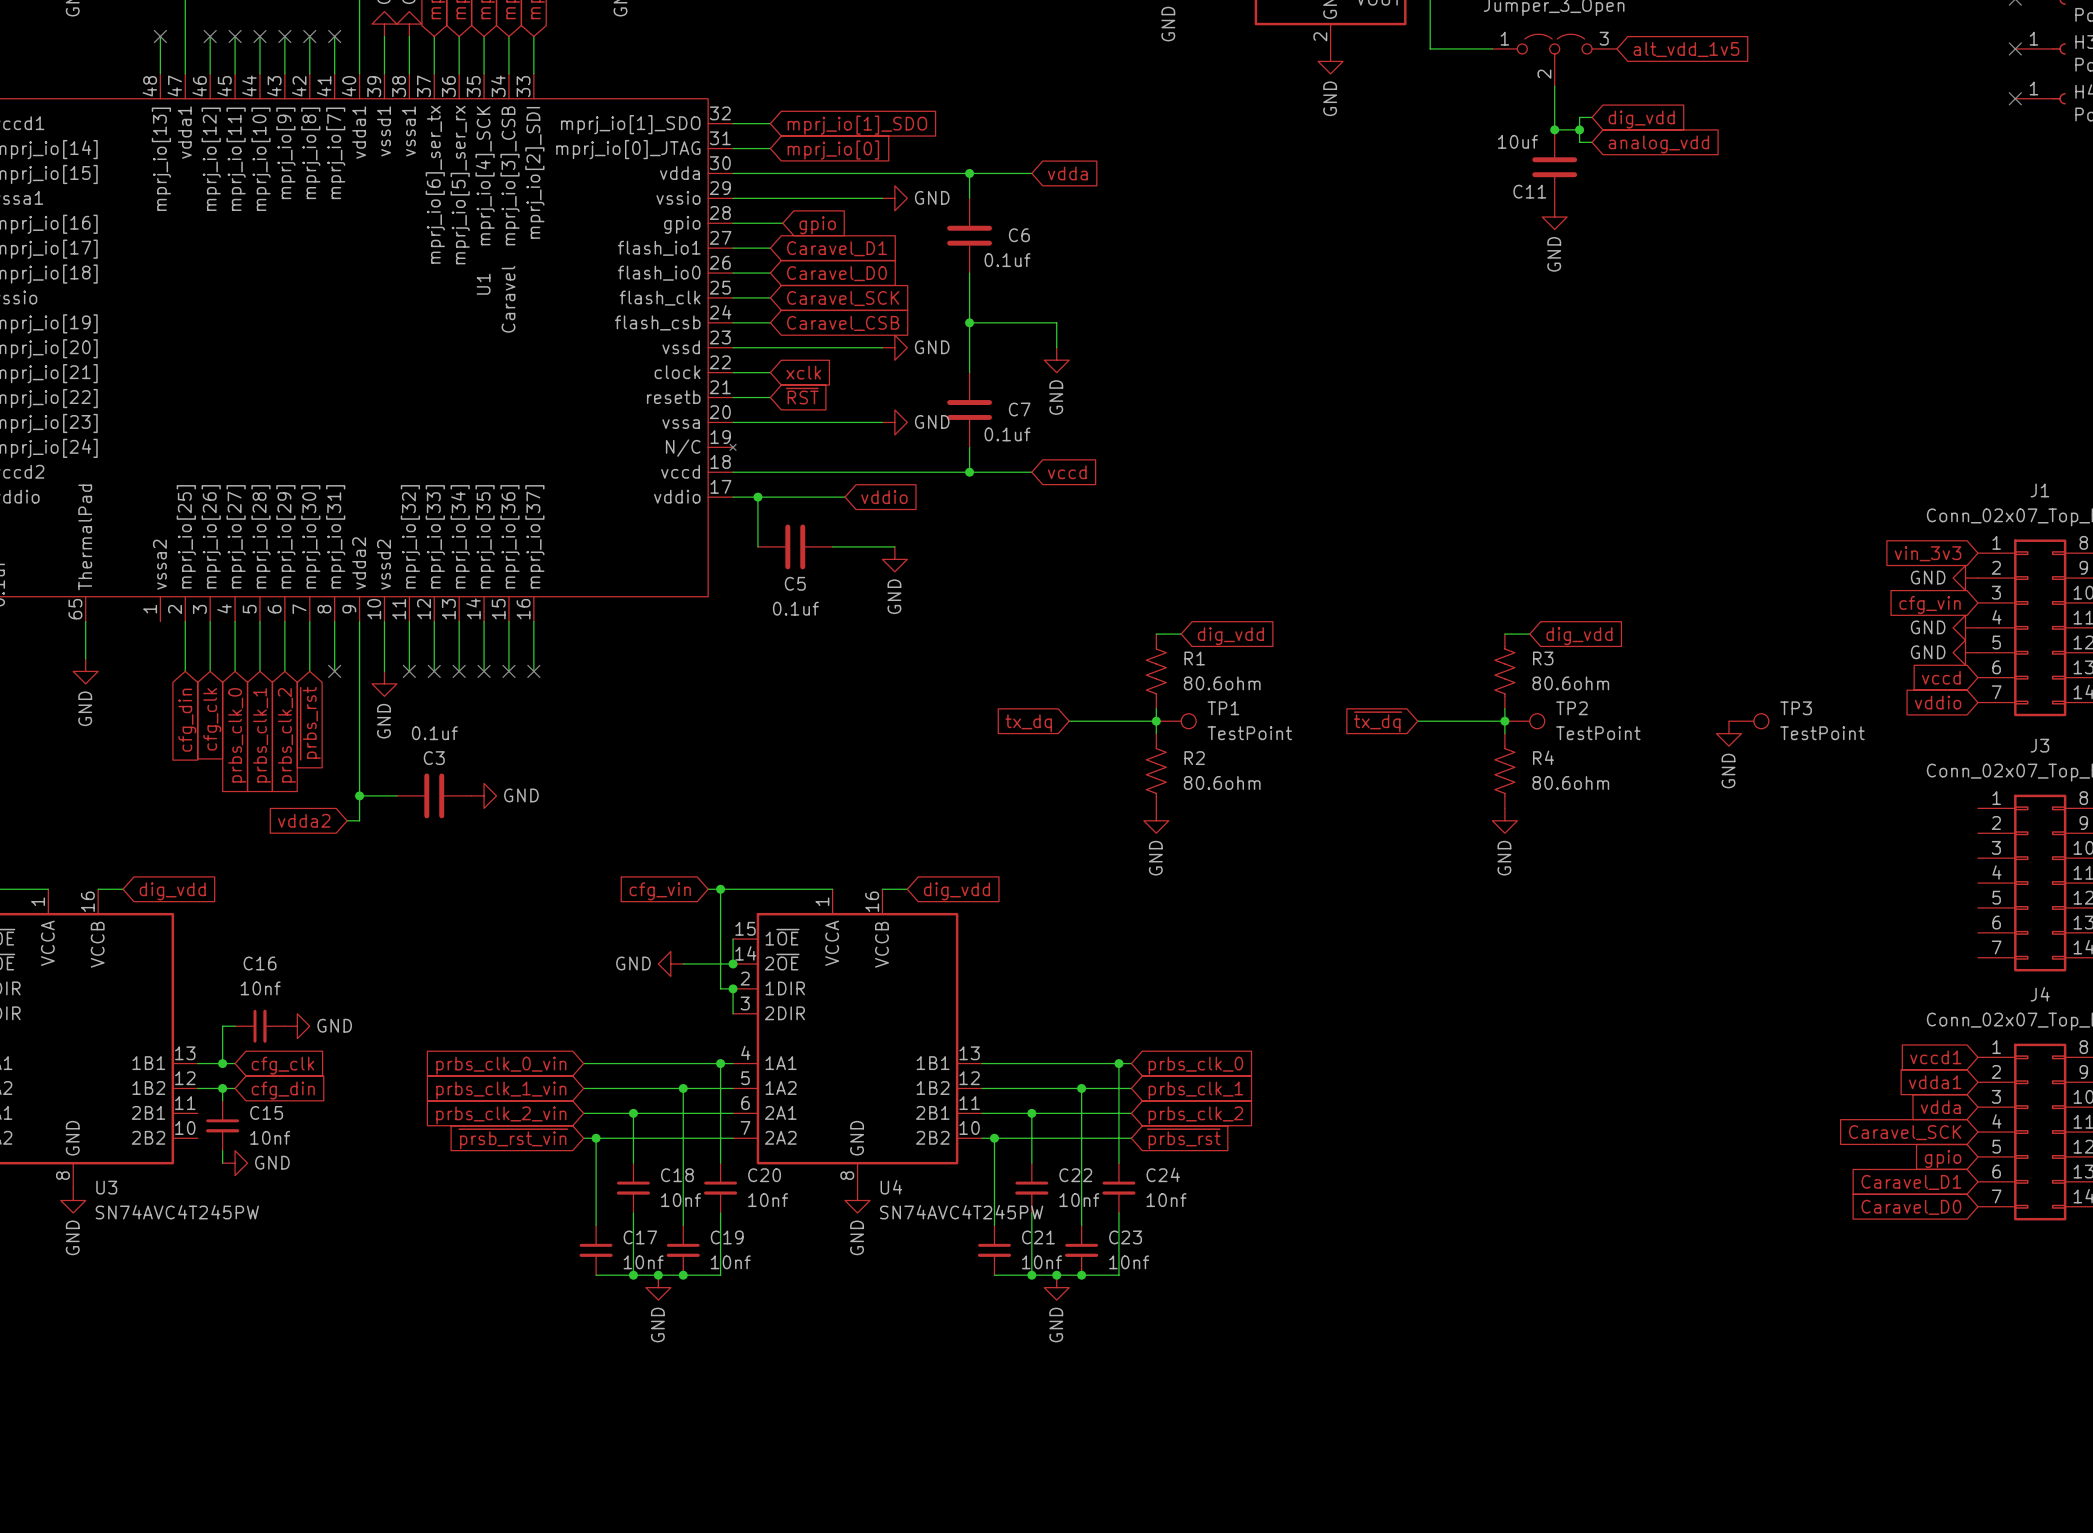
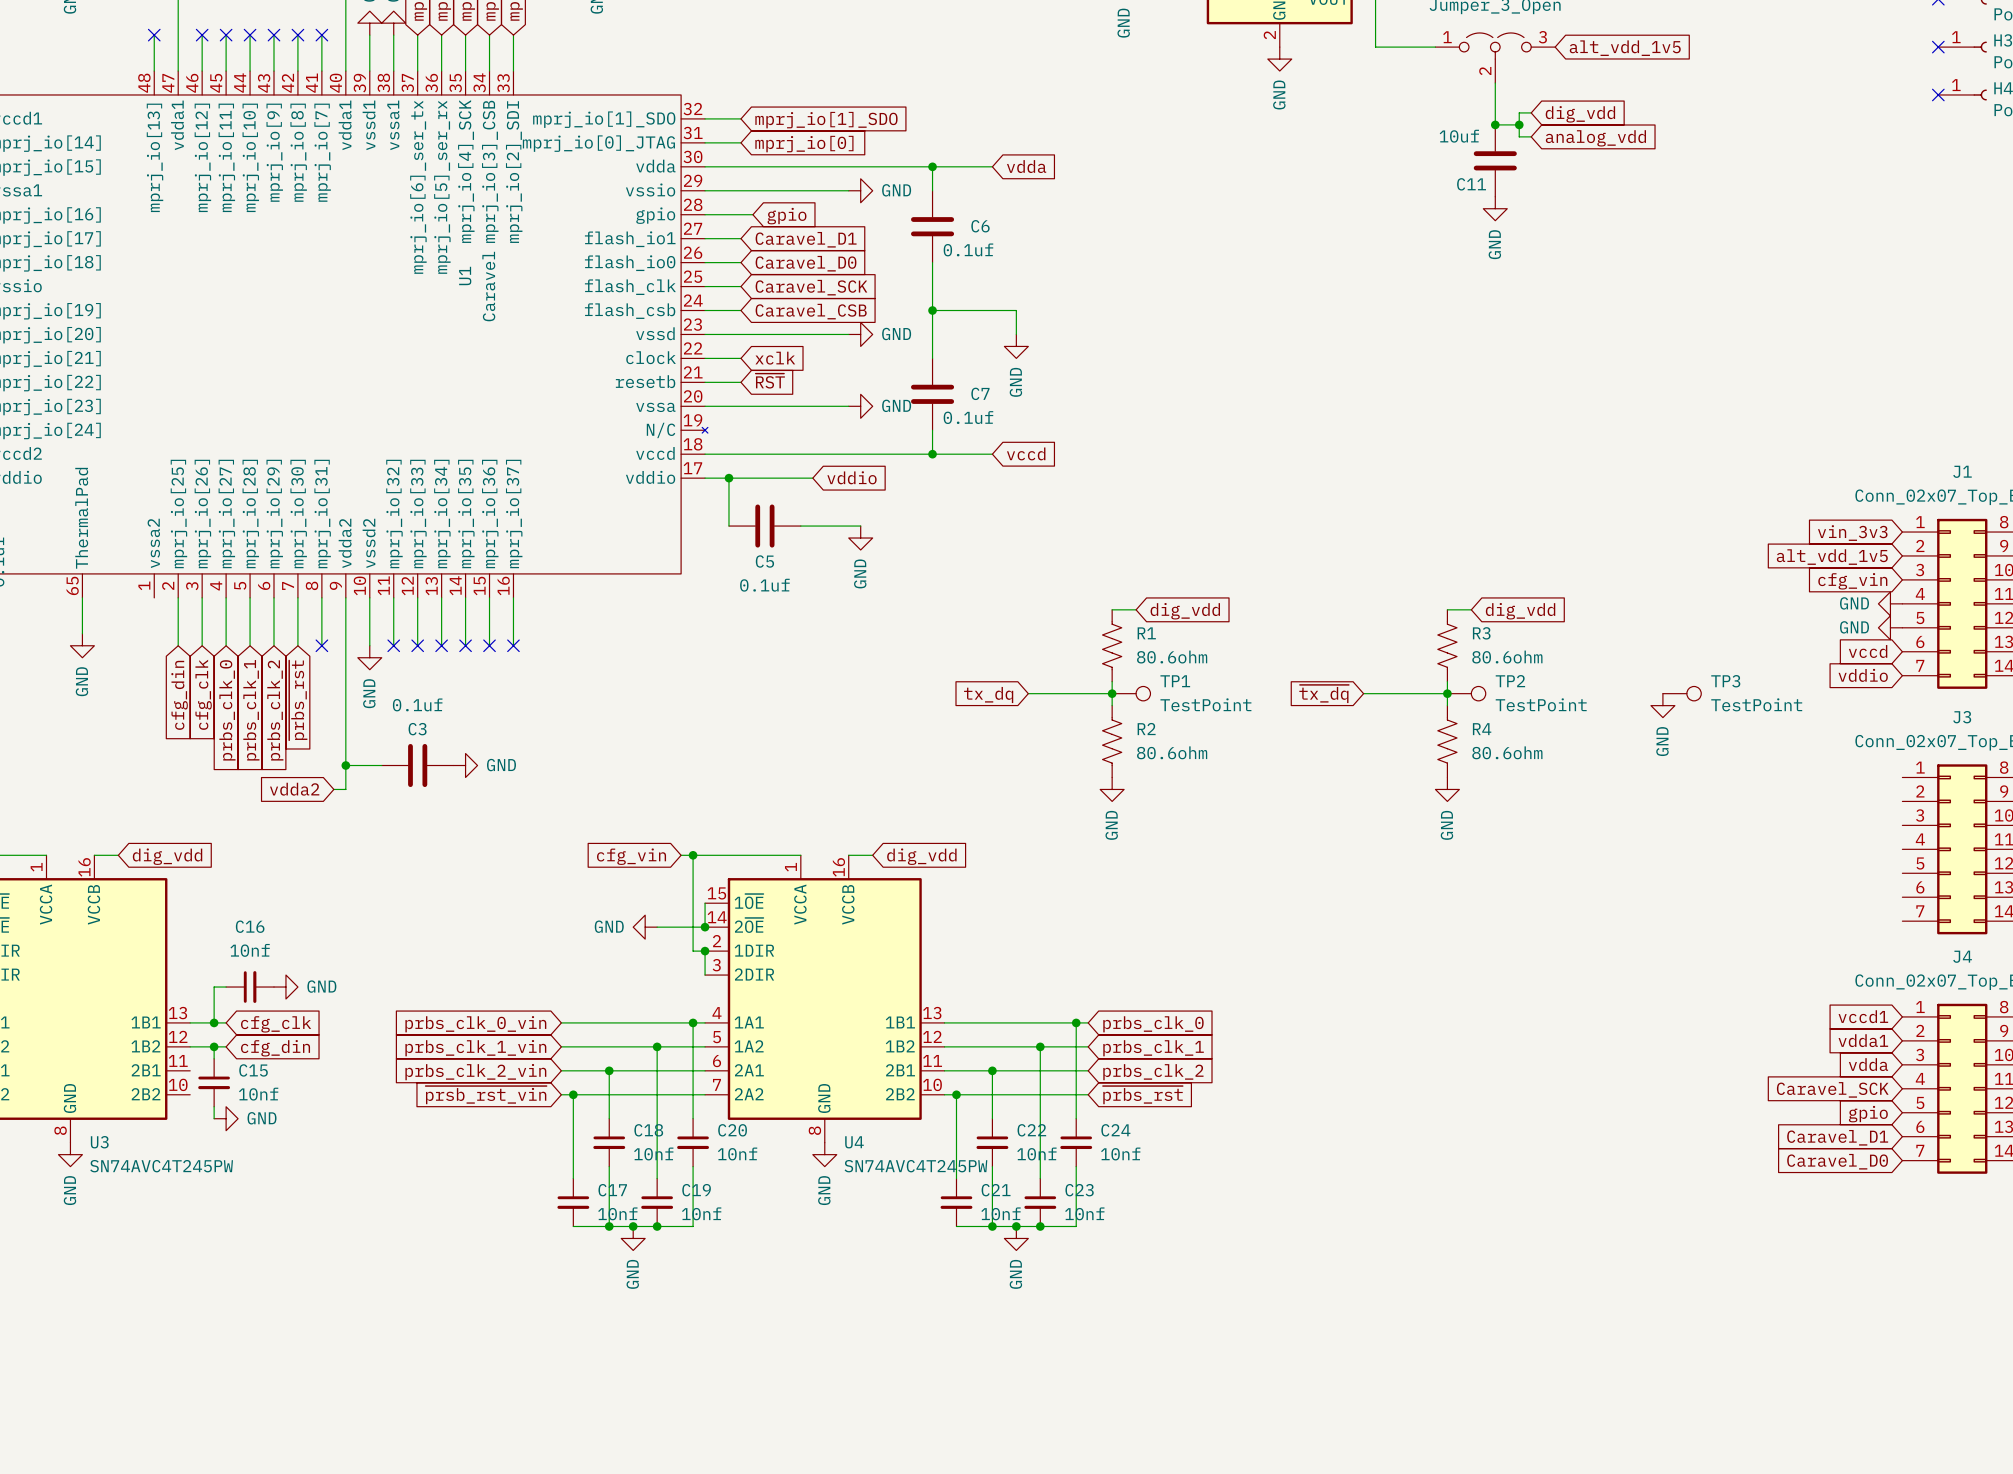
global label: none -> alt_vdd_1v5 (1832, 557)
power symbol: GND (1965, 578) -> none

